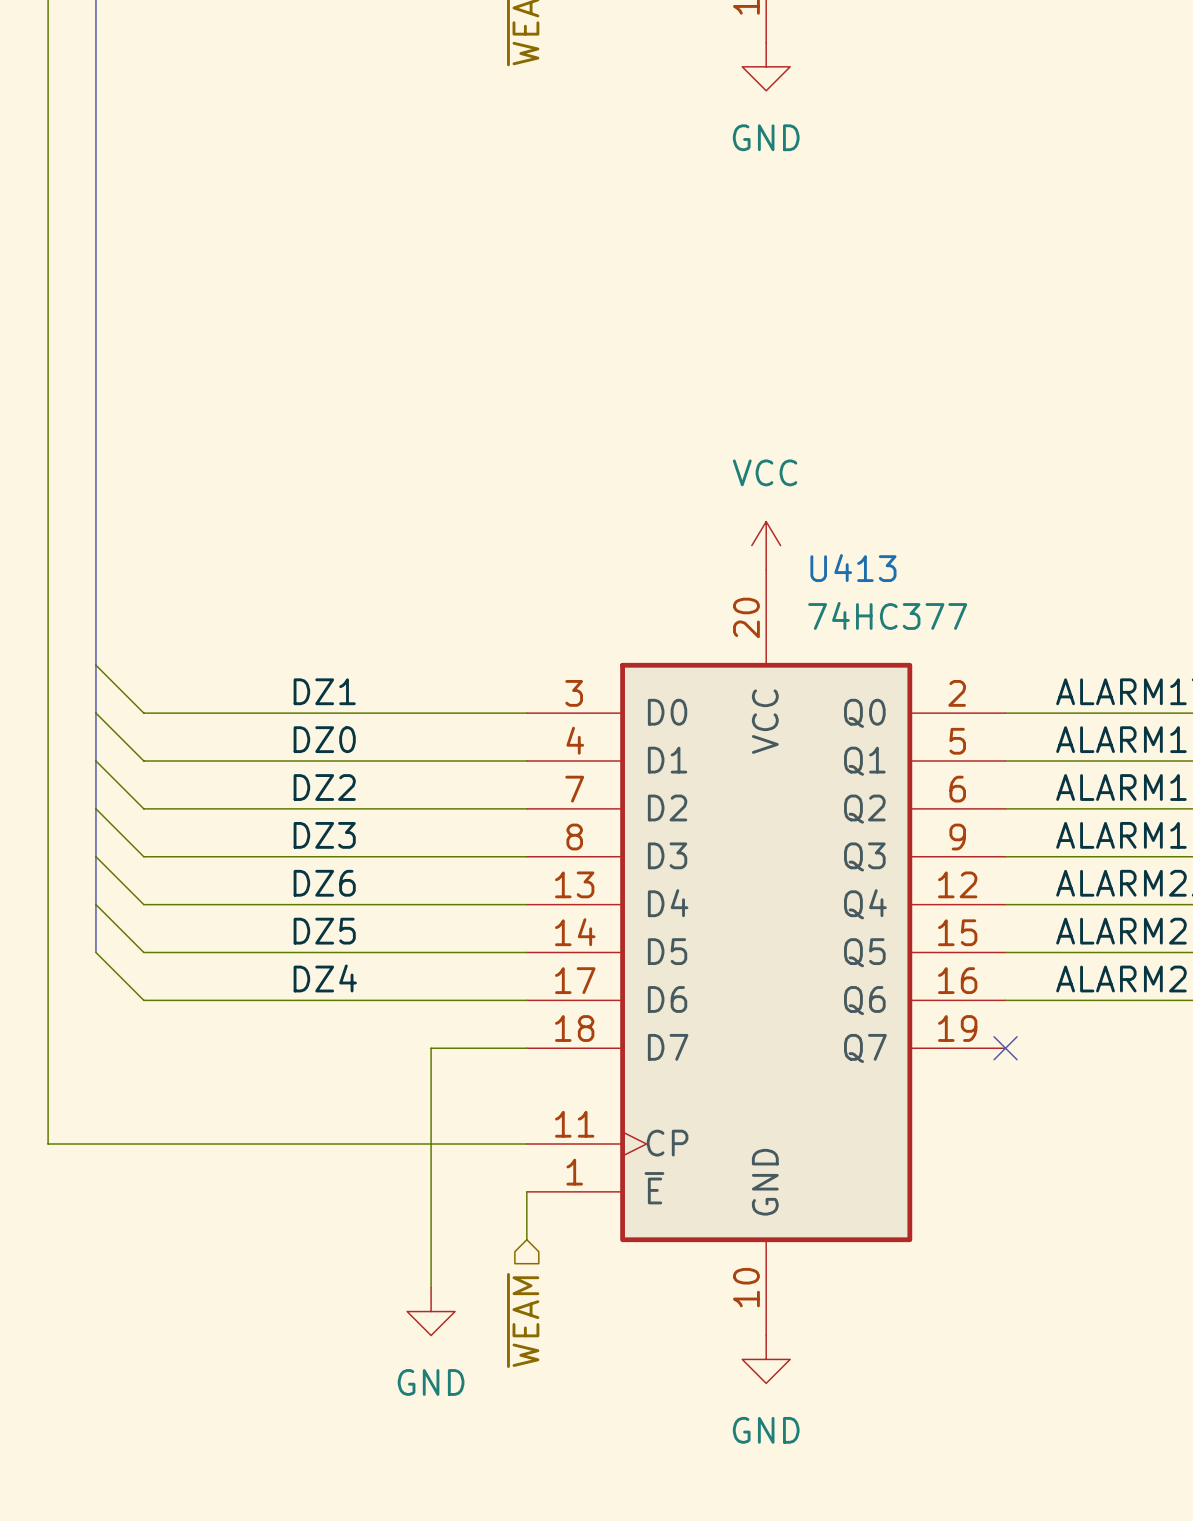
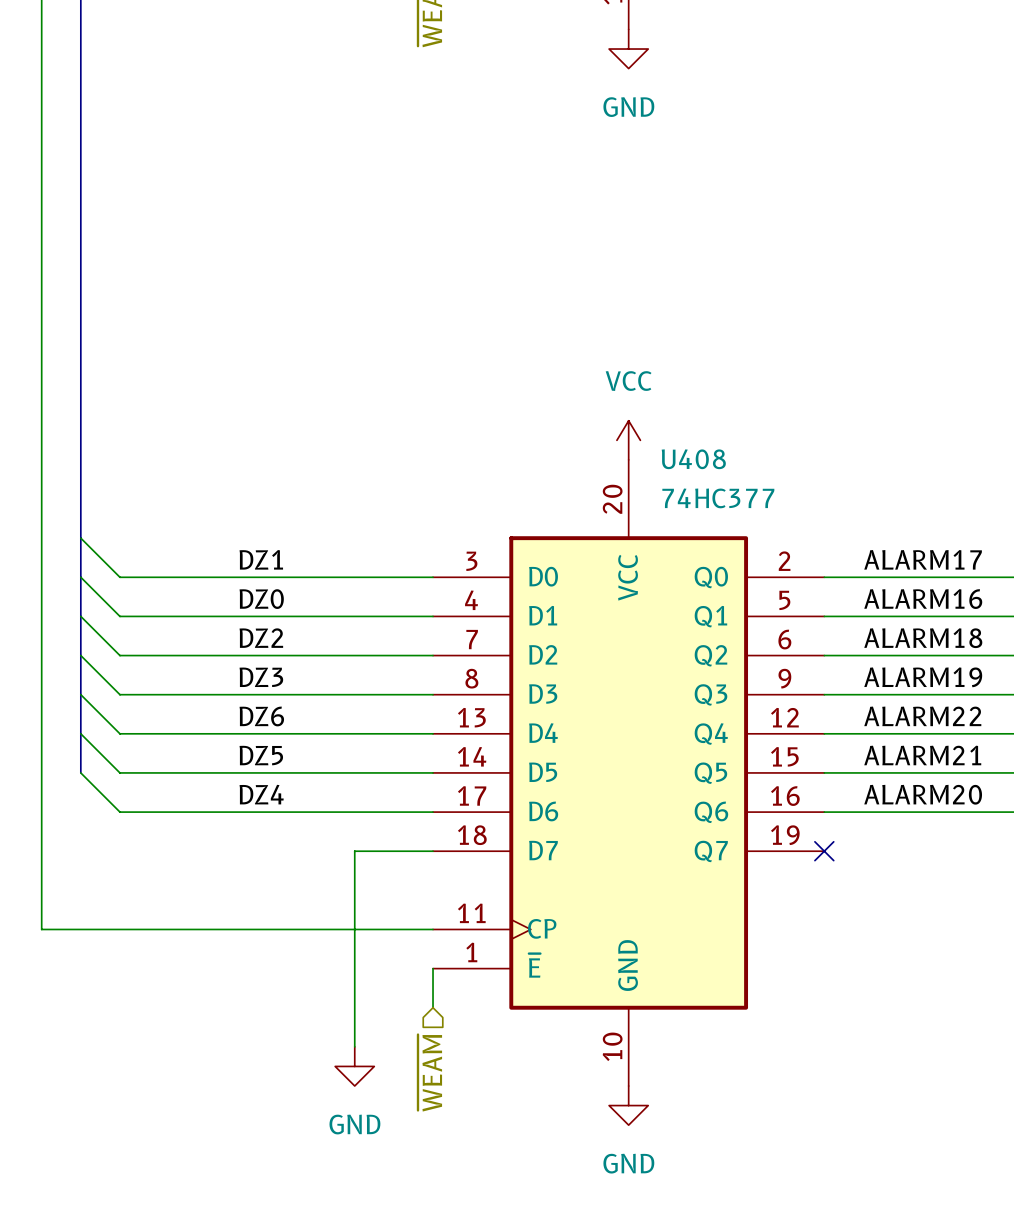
U413 name: U413 (853, 568) -> U408 (693, 459)

